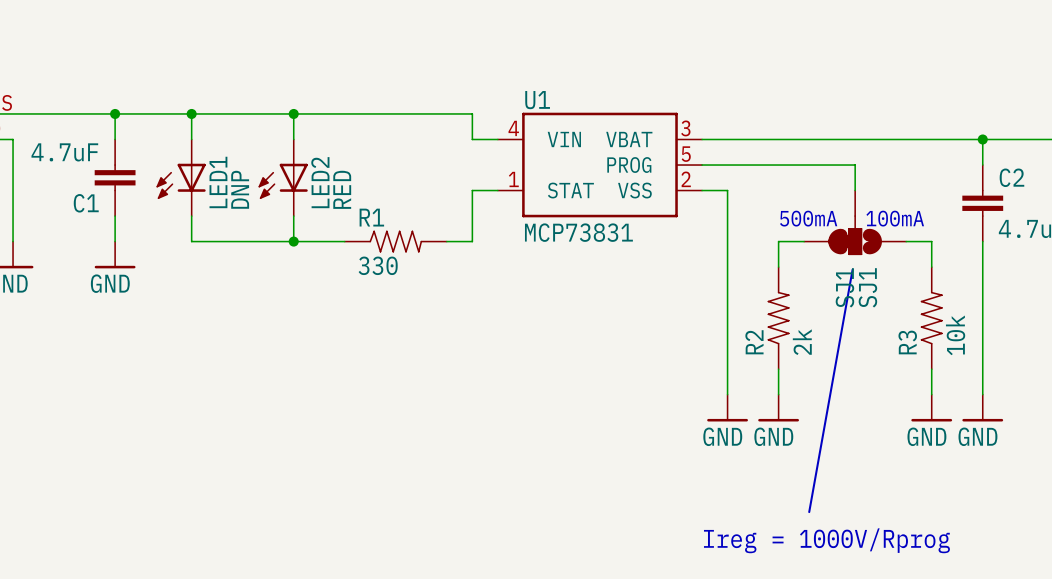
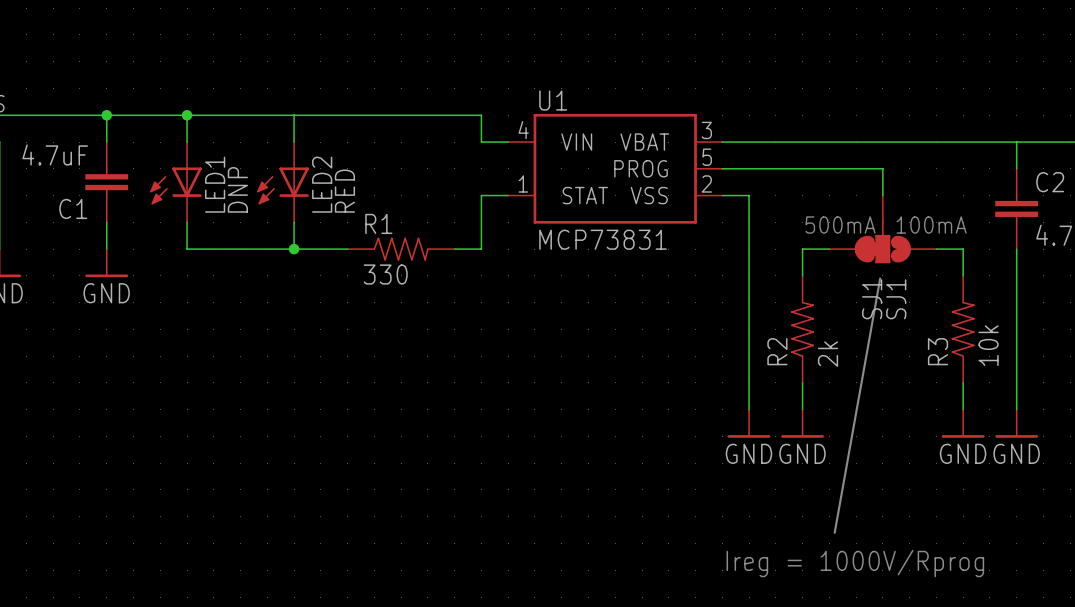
junction: (293, 113) -> none
junction: (982, 139) -> none

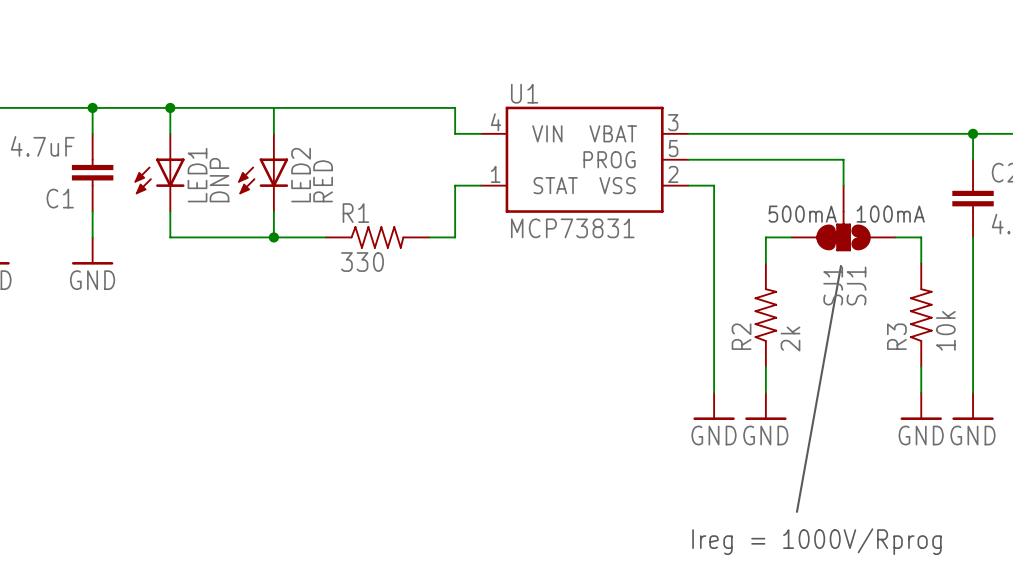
junction: none -> (973, 133)

